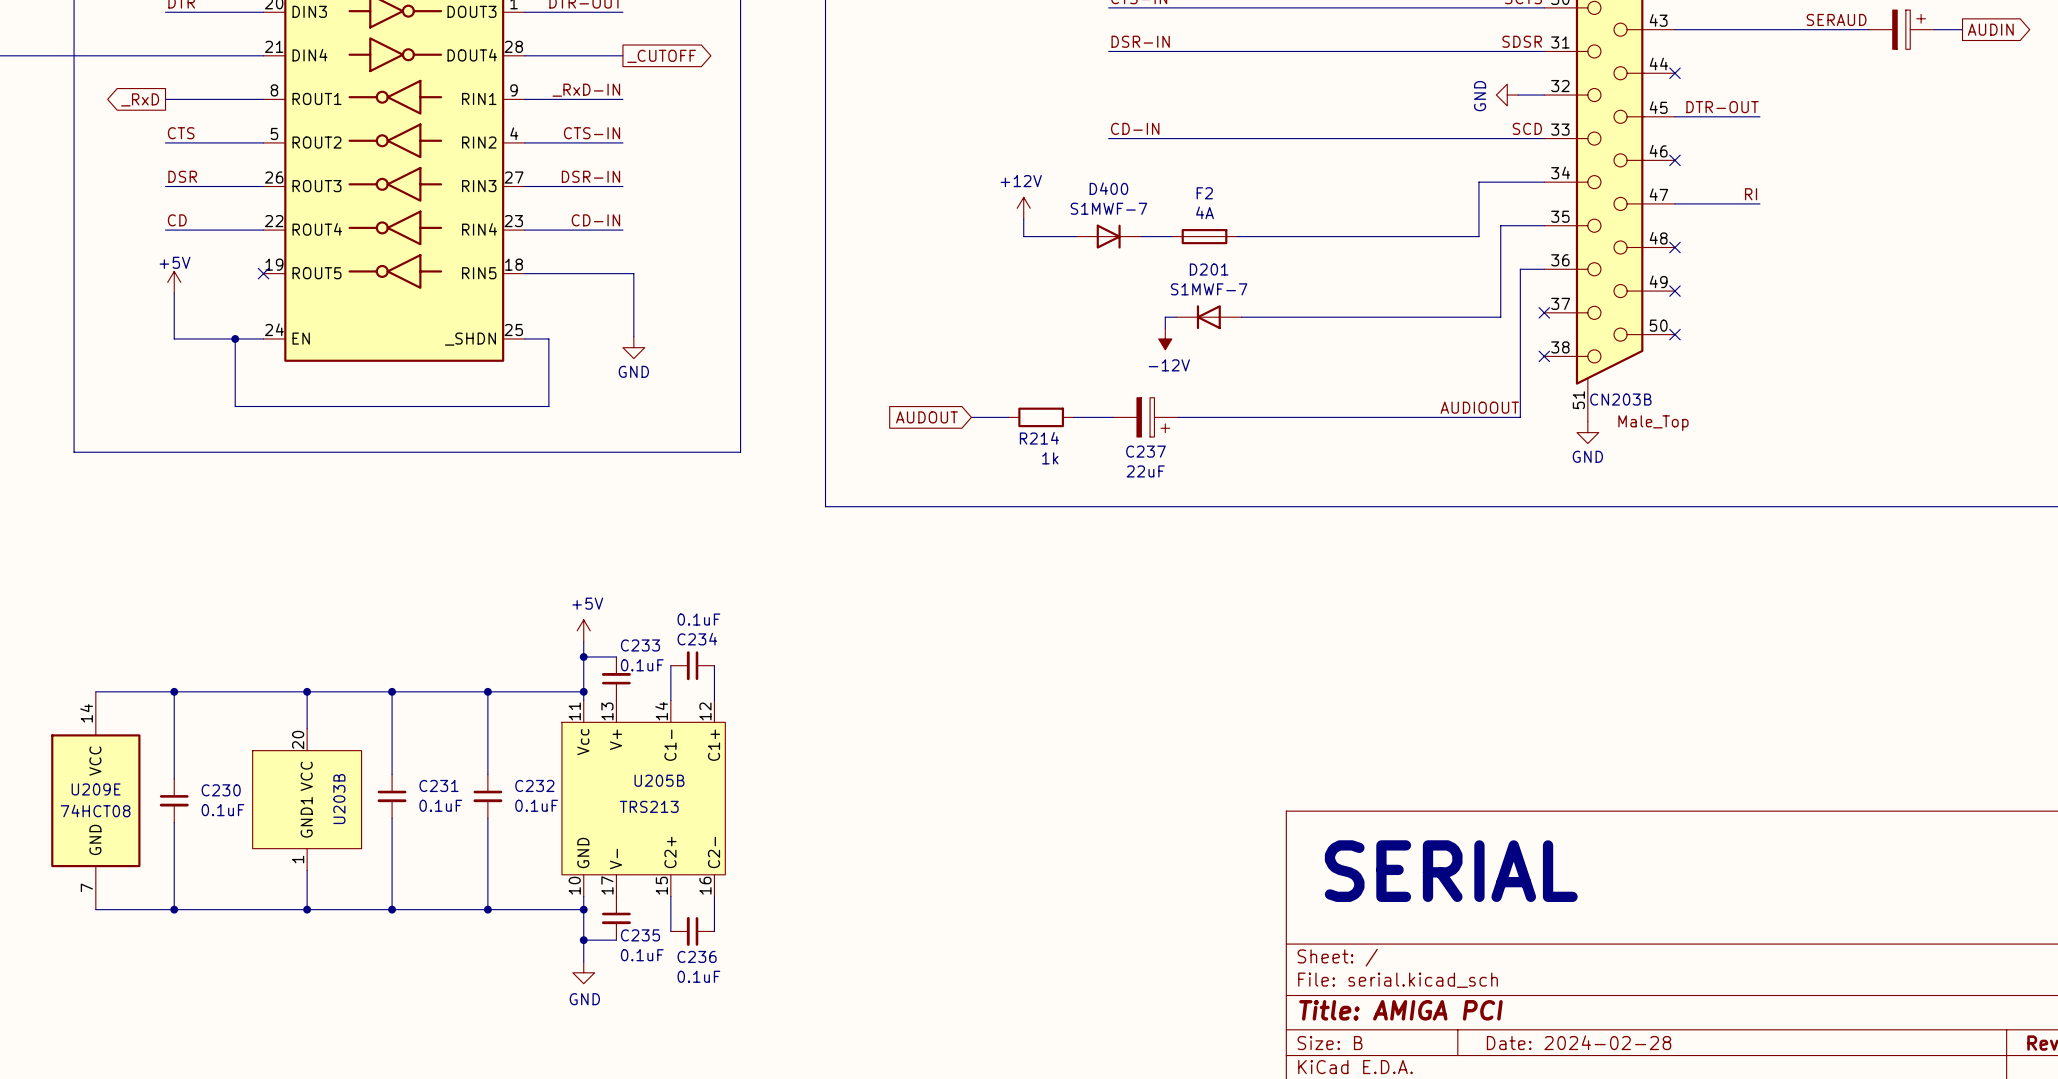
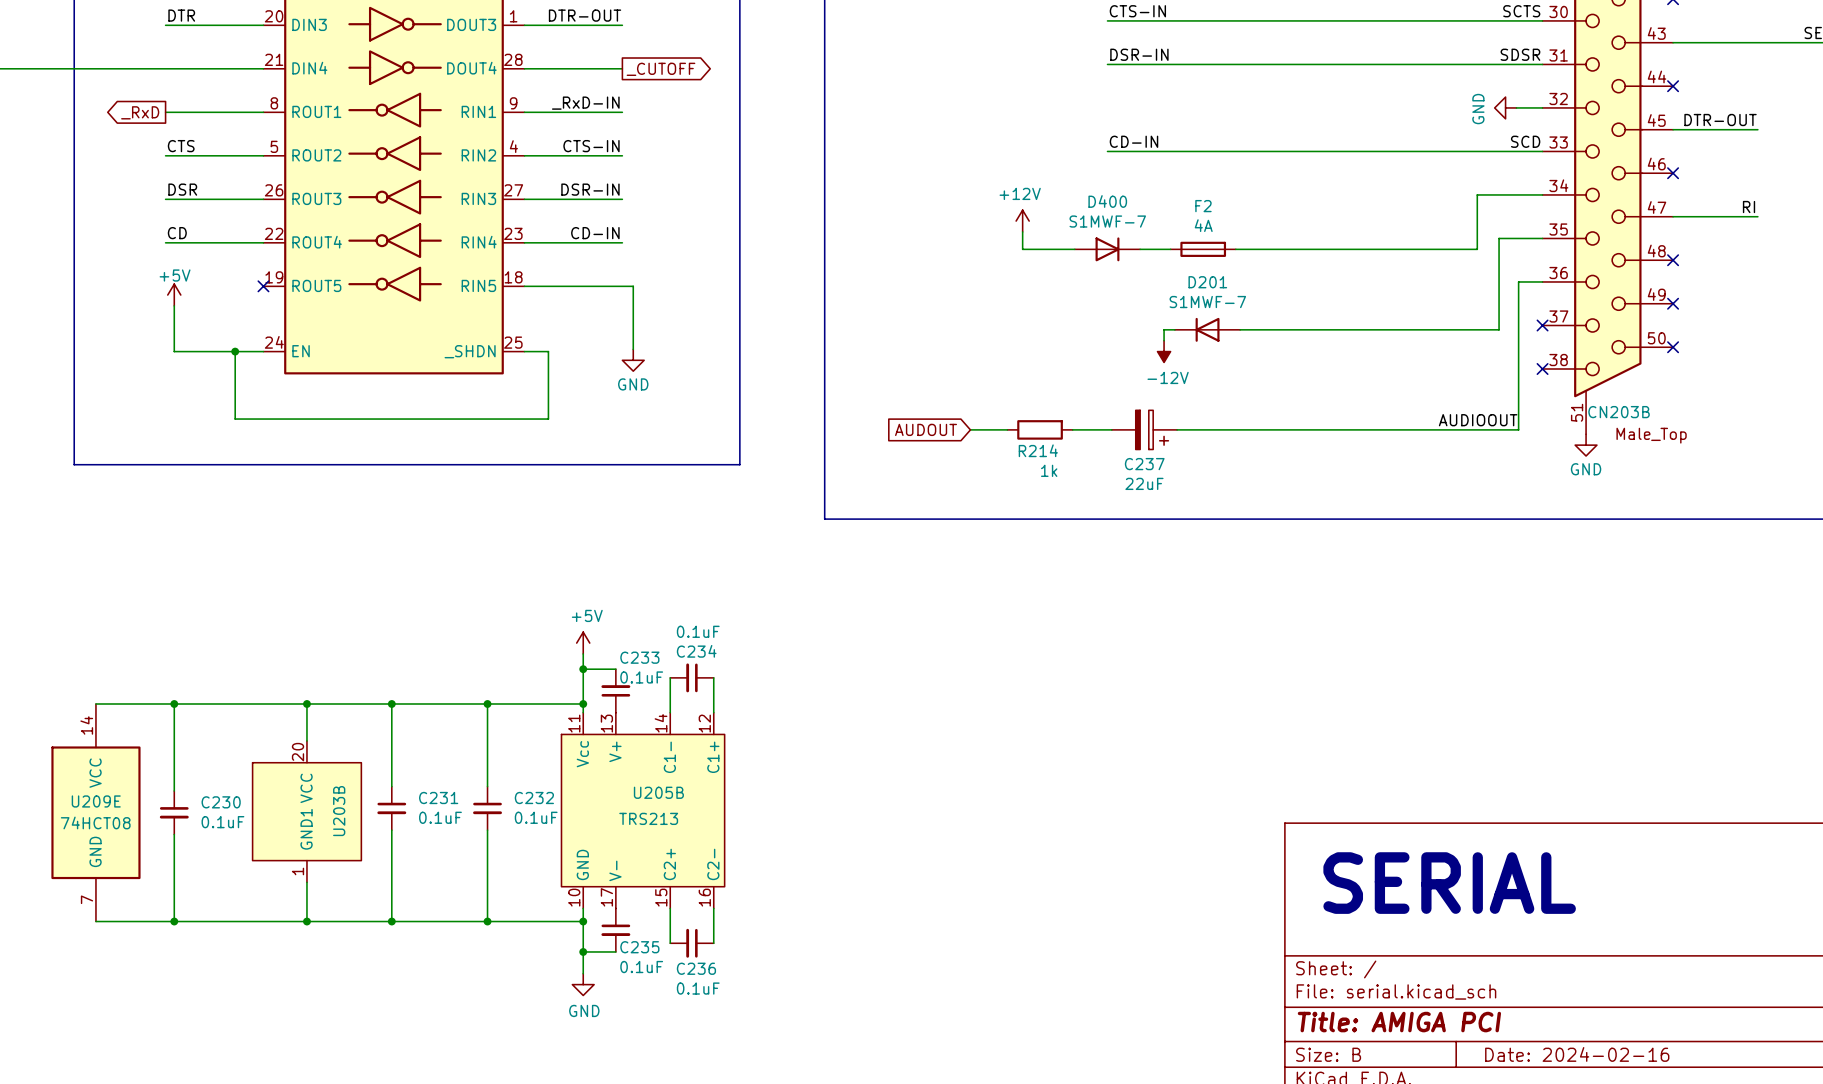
title block: Date: 2024-02-28 (1579, 1042) -> Date: 2024-02-16 (1577, 1054)

